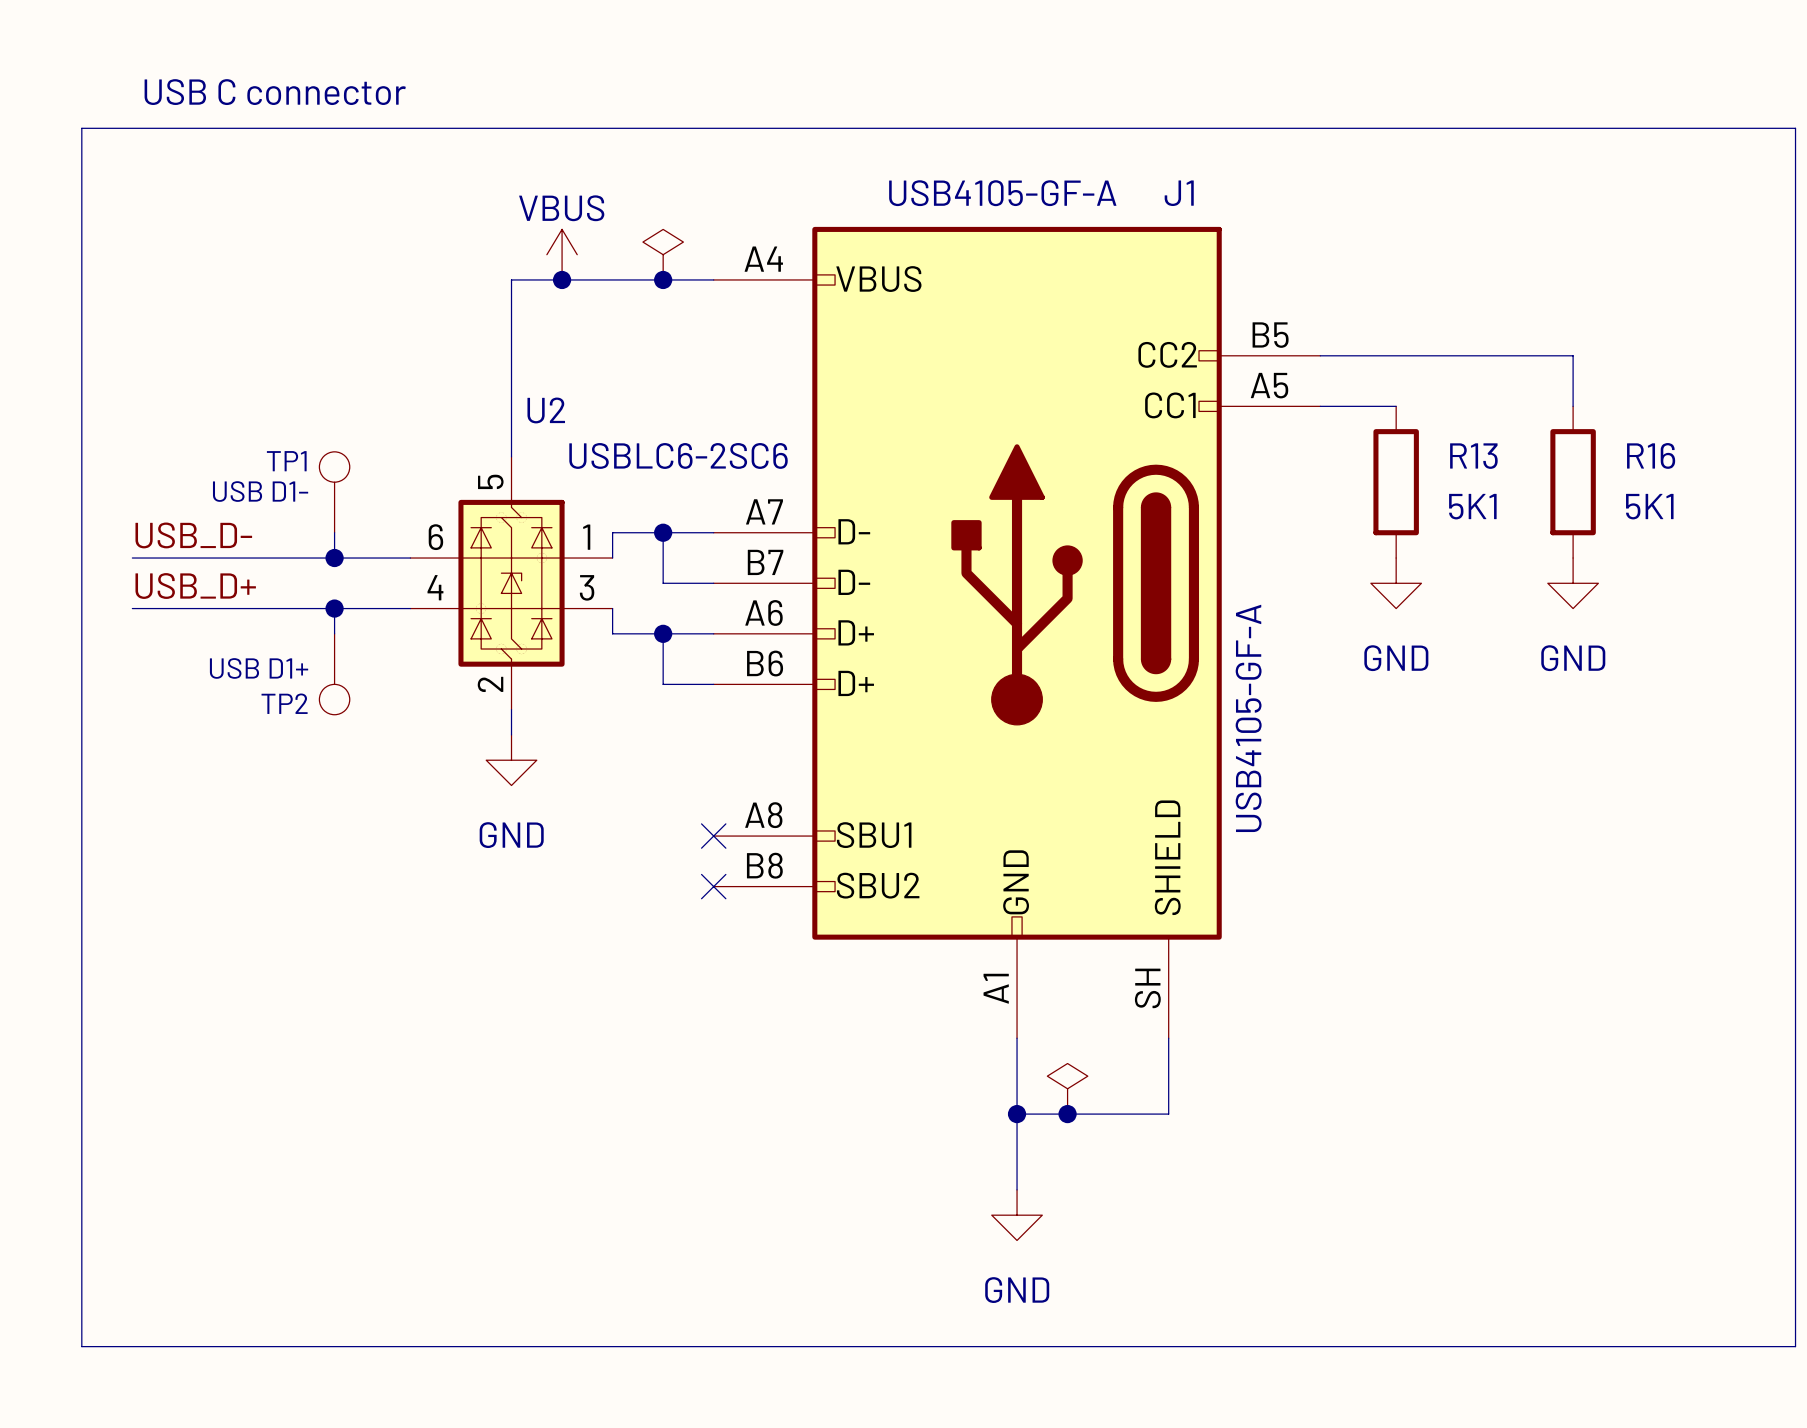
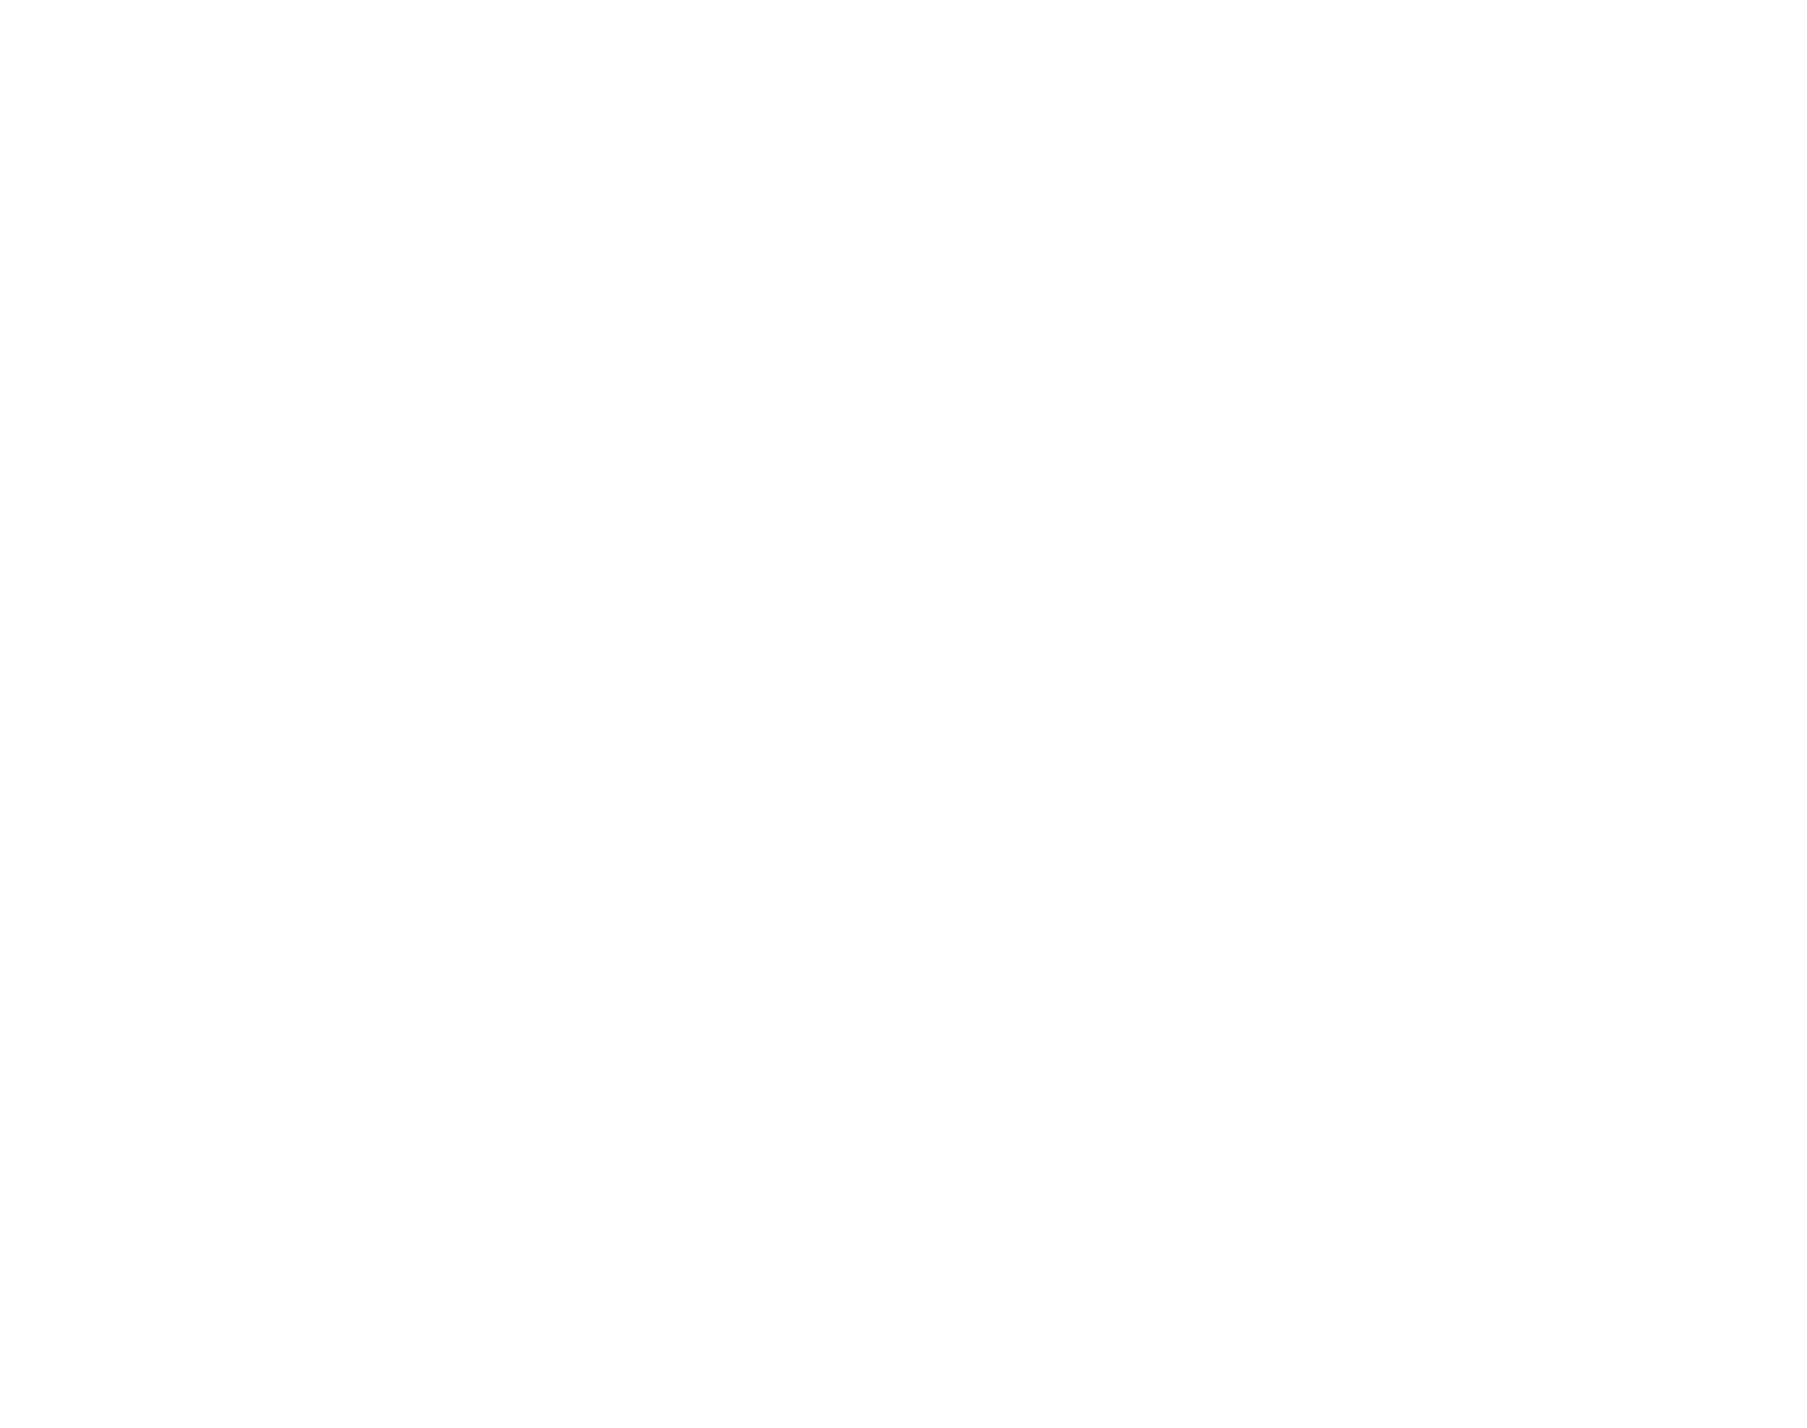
text: USB C connector (275, 92) -> none
line: (81, 128) (1795, 128) (1795, 1346) (81, 1346) (81, 128) -> none
text: USB4105-GF-A (1002, 193) -> none
power symbol: VBUS (562, 254) -> none
power symbol: (663, 254) -> none
junction: (562, 279) -> none
junction: (663, 279) -> none
wire: (713, 279) (511, 279) (511, 456) -> none
wire: (1320, 355) (1573, 355) (1573, 406) -> none
wire: (1320, 406) (1396, 406) -> none
R13: 5K1 (1396, 482) -> none
R16: 5K1 (1573, 482) -> none
TP1: USB D1- (334, 492) -> none
wire: (334, 532) (334, 558) -> none
wire: (663, 532) (663, 583) (713, 583) -> none
junction: (663, 532) -> none
wire: (713, 532) (612, 532) (612, 558) -> none
label: USB_D- (193, 535) -> none
wire: (132, 558) (410, 558) -> none
junction: (334, 558) -> none
U2: USBLC6-2SC6 (511, 583) -> none
power symbol: GND (1396, 583) -> none
power symbol: GND (1573, 583) -> none
label: USB_D+ (195, 586) -> none
wire: (132, 608) (410, 608) -> none
wire: (334, 608) (334, 633) -> none
junction: (334, 608) -> none
wire: (612, 608) (612, 633) (713, 633) -> none
J1: USB4105-GF-A (1017, 632) -> none
wire: (663, 633) (663, 684) (713, 684) -> none
junction: (663, 633) -> none
TP2: USB D1+ (334, 674) -> none
wire: (511, 709) (511, 734) -> none
power symbol: GND (511, 760) -> none
no-connect mark: (713, 836) -> none
no-connect mark: (713, 886) -> none
wire: (1017, 1038) (1017, 1189) -> none
wire: (1168, 1038) (1168, 1114) (1017, 1114) -> none
power symbol: (1067, 1088) -> none
junction: (1017, 1114) -> none
junction: (1067, 1114) -> none
power symbol: GND (1017, 1215) -> none

